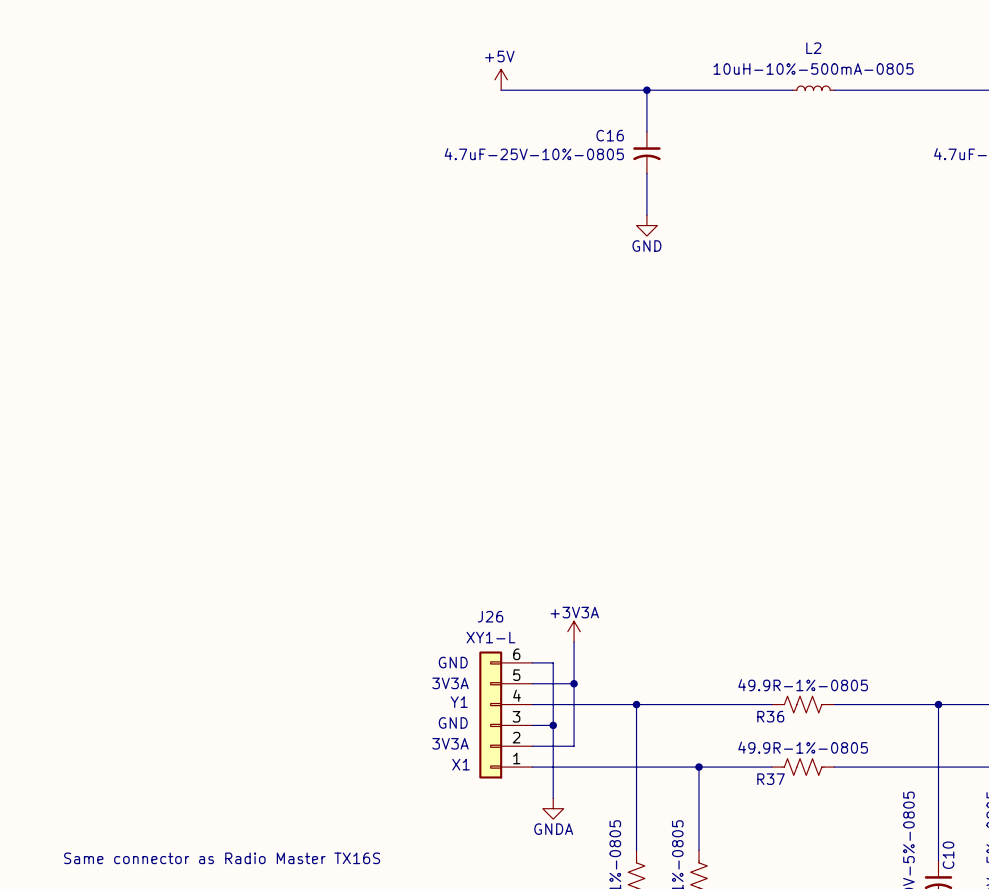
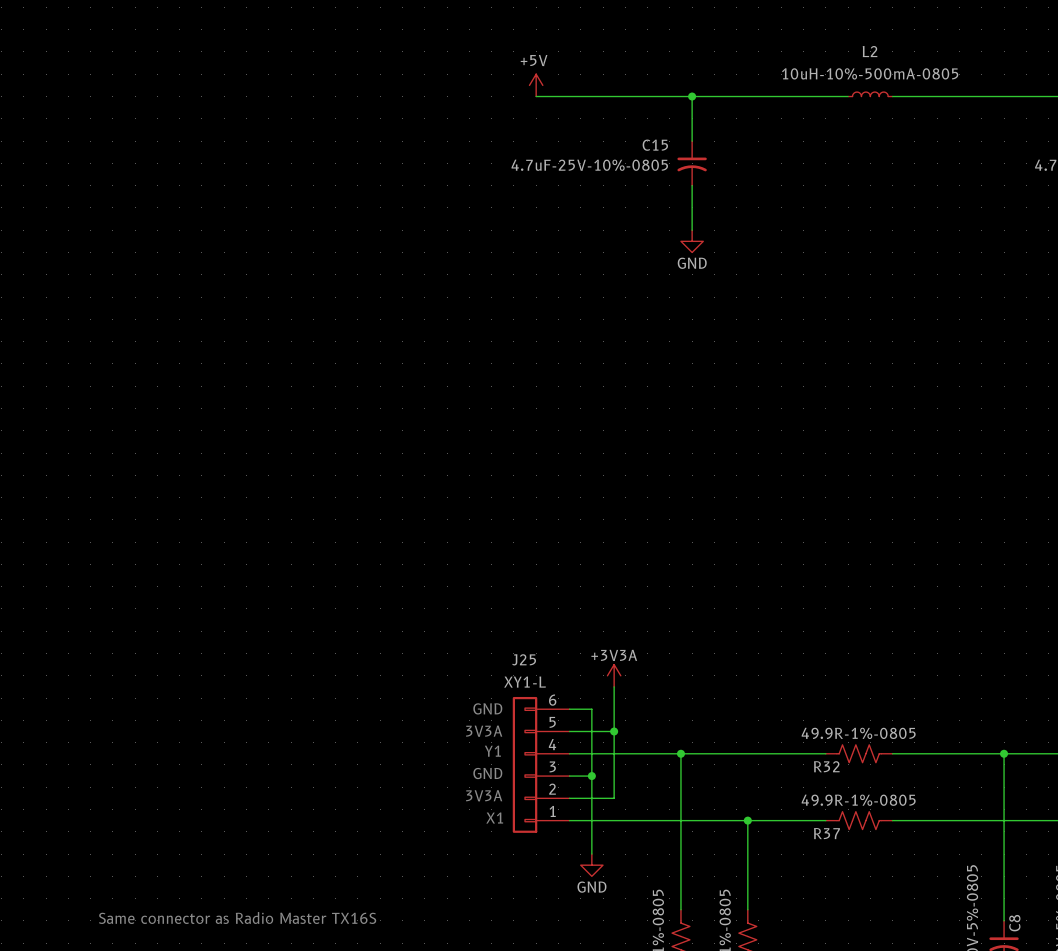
C16 name: C16 (610, 135) -> C15 (655, 145)
J26 name: J26 (490, 616) -> J25 (524, 659)
R36 name: R36 (770, 716) -> R32 (826, 766)
power symbol: GNDA (553, 808) -> GND (591, 865)
C10 name: C10 (948, 855) -> C8 (1014, 923)

